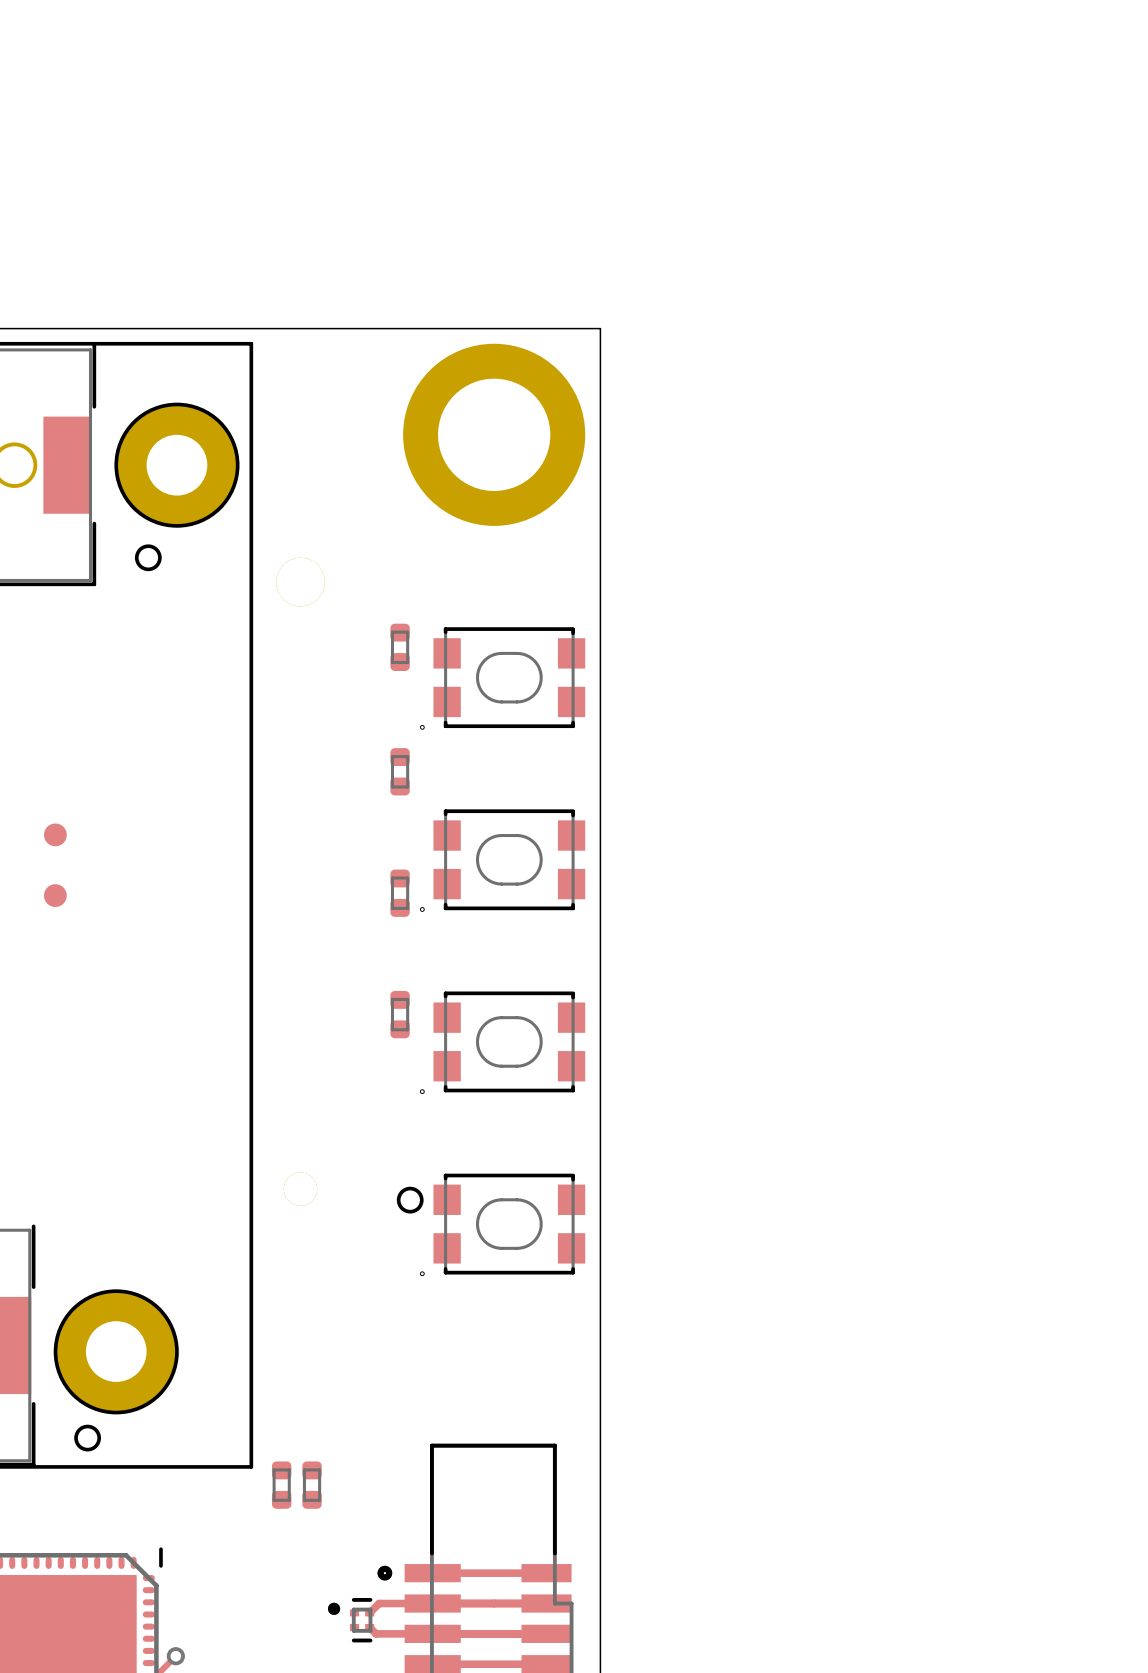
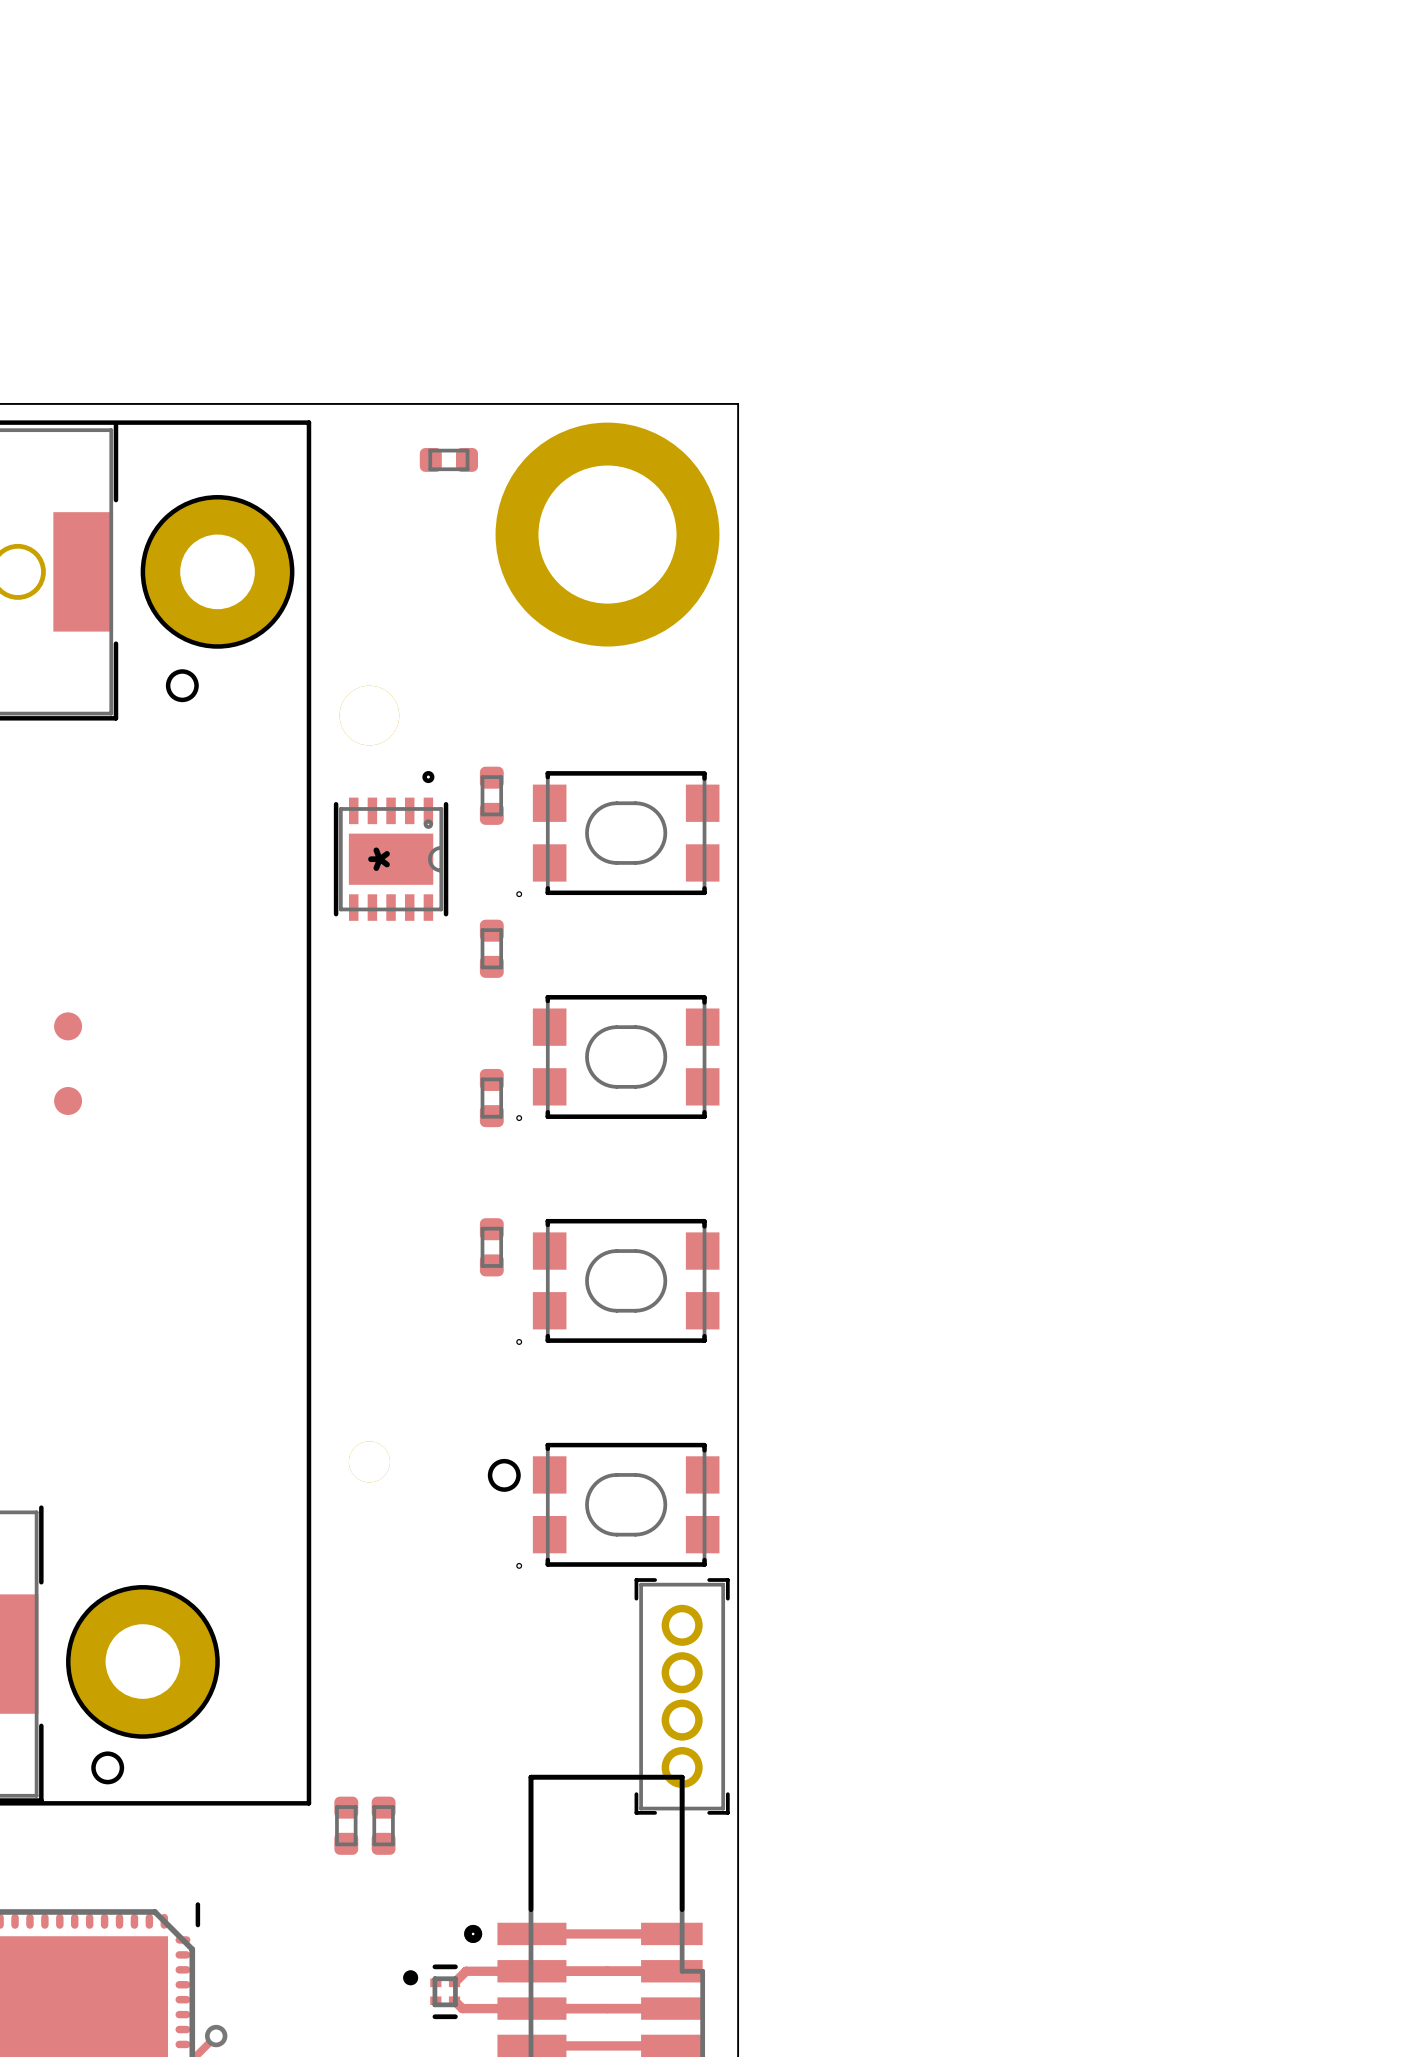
part: none -> (448, 459)
part: none -> (391, 845)
part: none -> (682, 1696)

